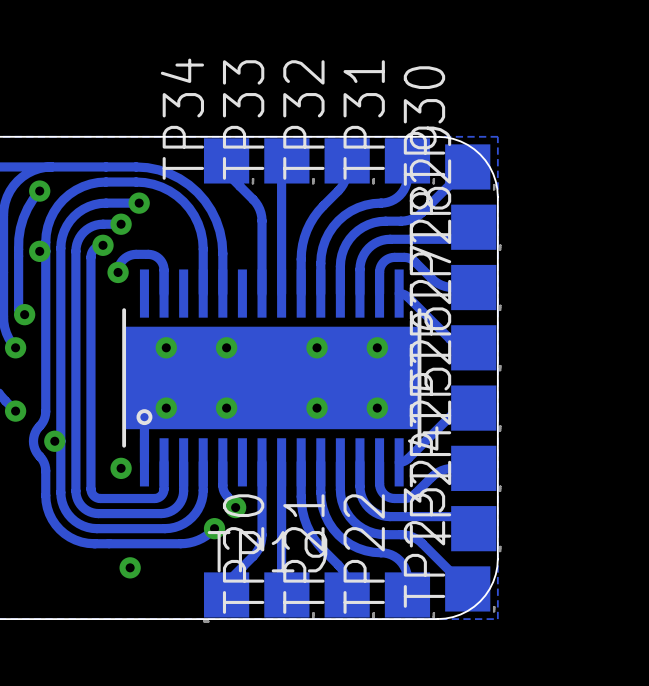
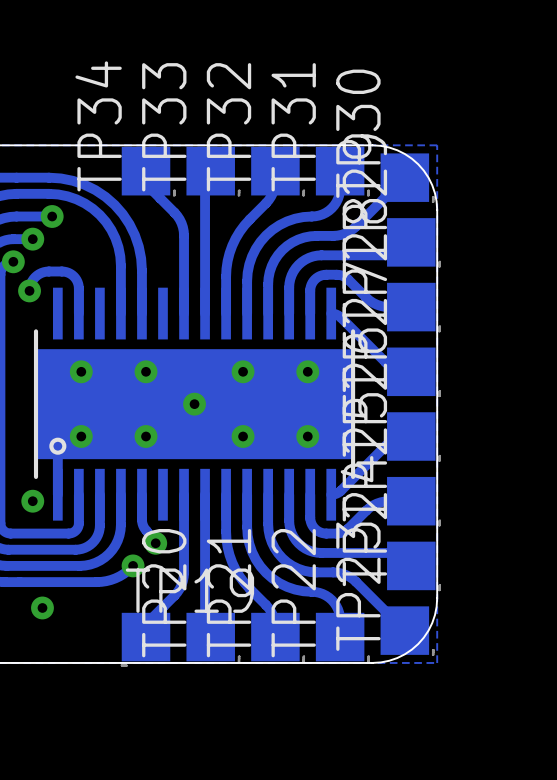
via: none -> (194, 404)

